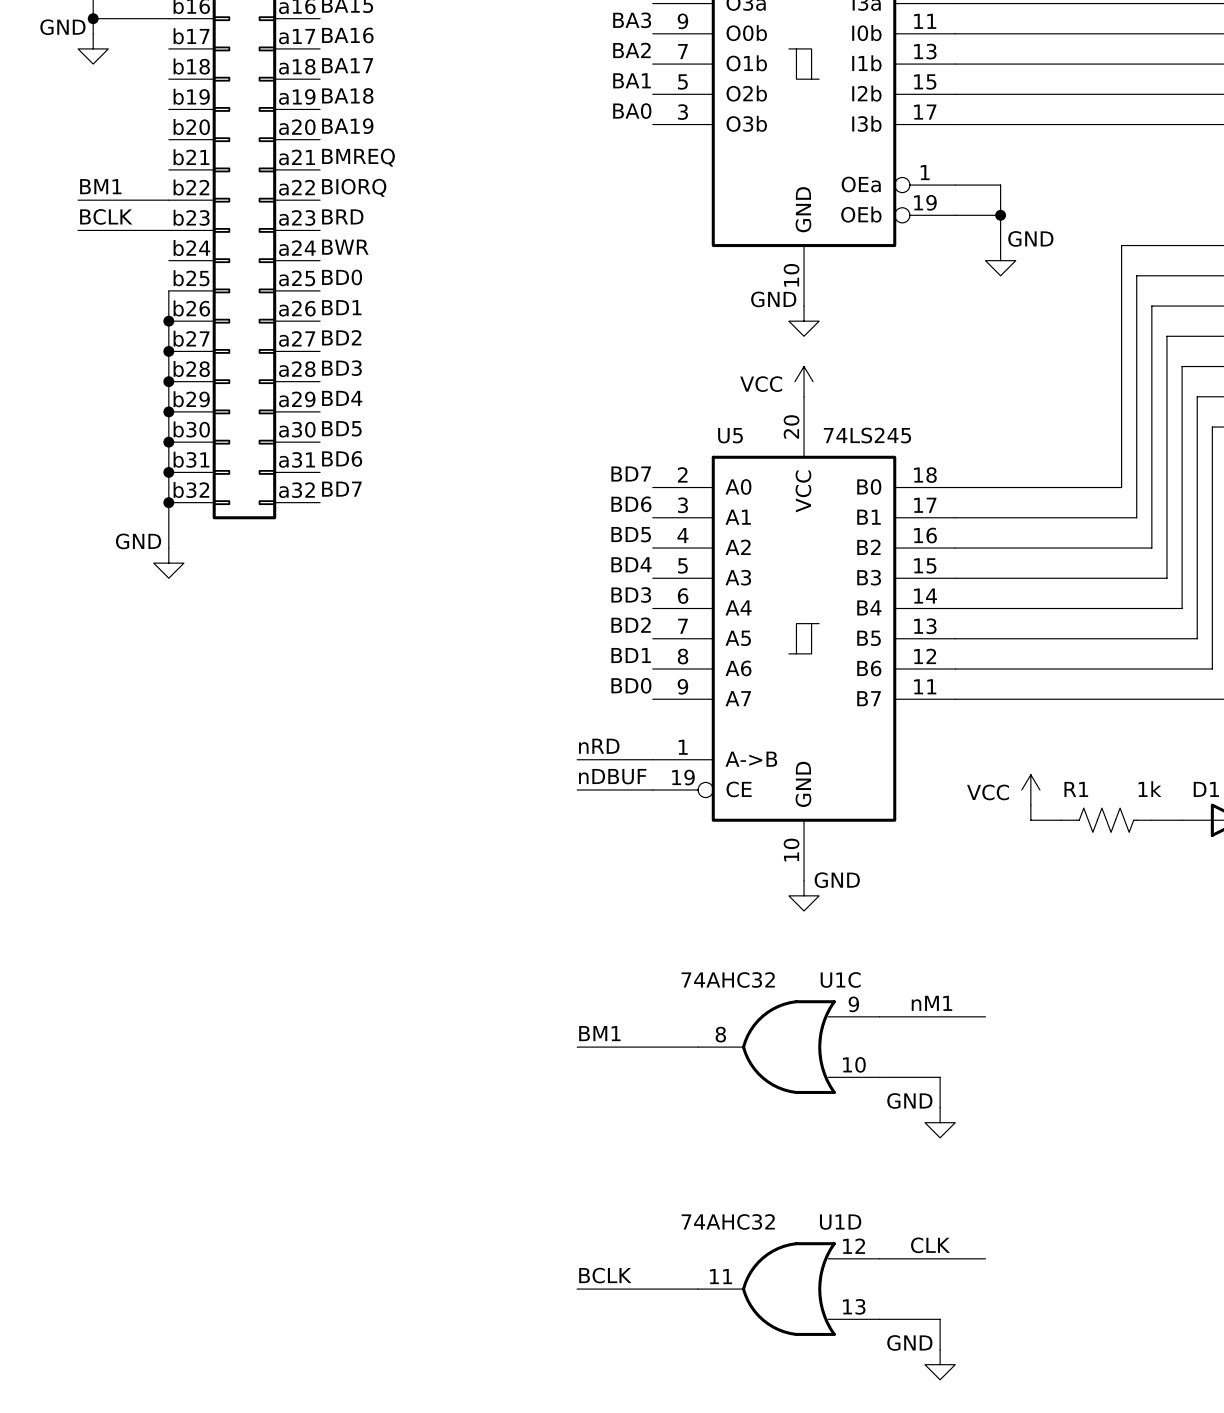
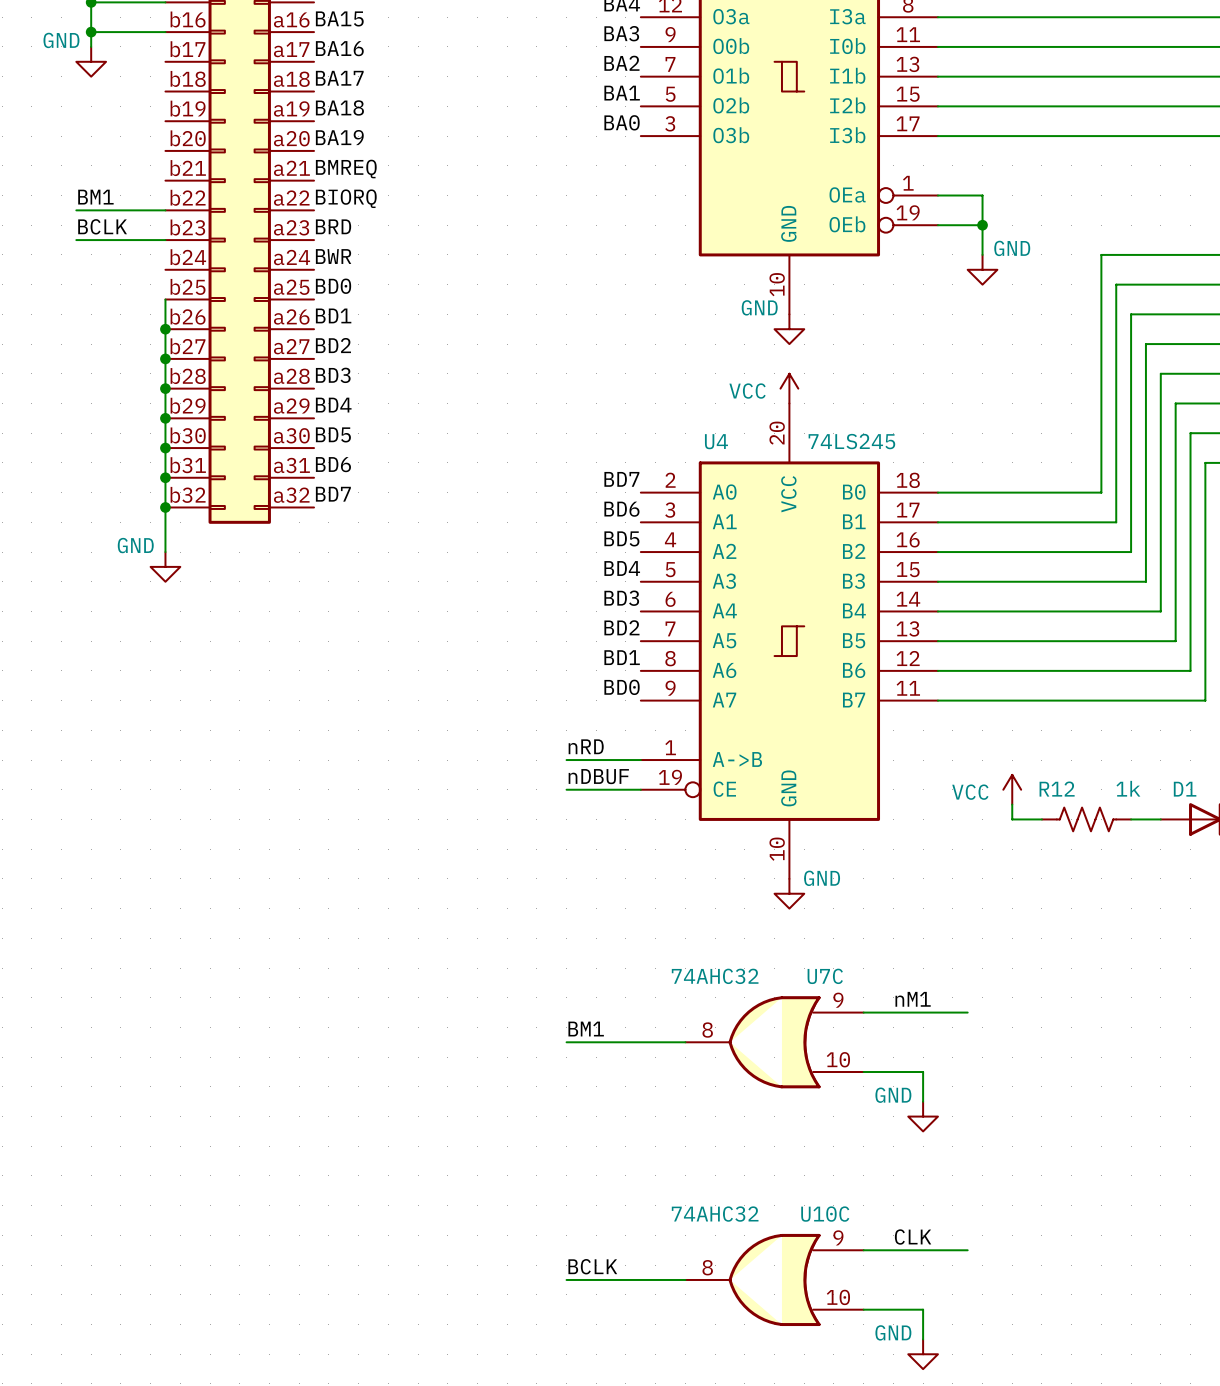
U5 name: U5 (730, 435) -> U4 (716, 441)
R1 name: R1 (1076, 789) -> R12 (1057, 789)
U1C name: U1C (840, 979) -> U7C (825, 976)
U1D name: U1D (840, 1222) -> U10C (825, 1214)
U1D pin number: 12 (854, 1246) -> 9 (838, 1237)
U1D pin number: 11 (721, 1276) -> 8 (707, 1267)
U1D pin number: 13 (854, 1306) -> 10 (838, 1297)

